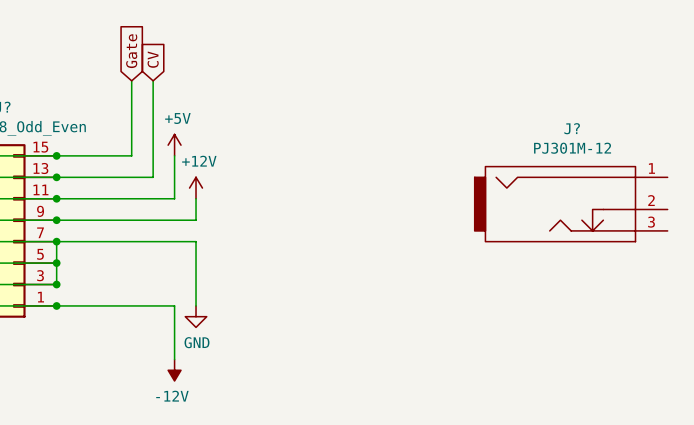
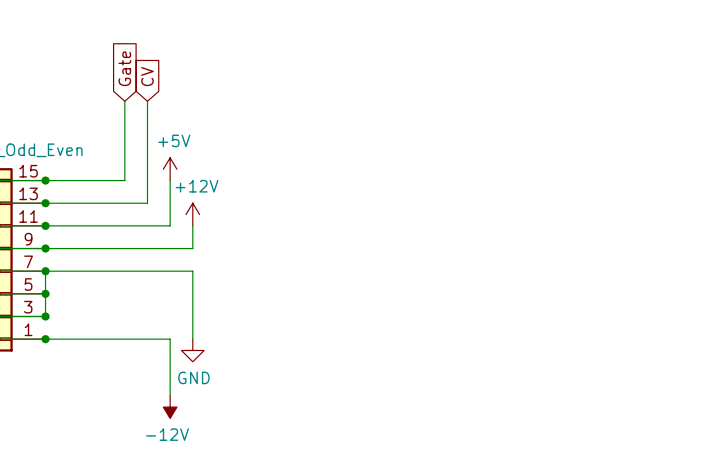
J?: PJ301M-12 (571, 204) -> none

